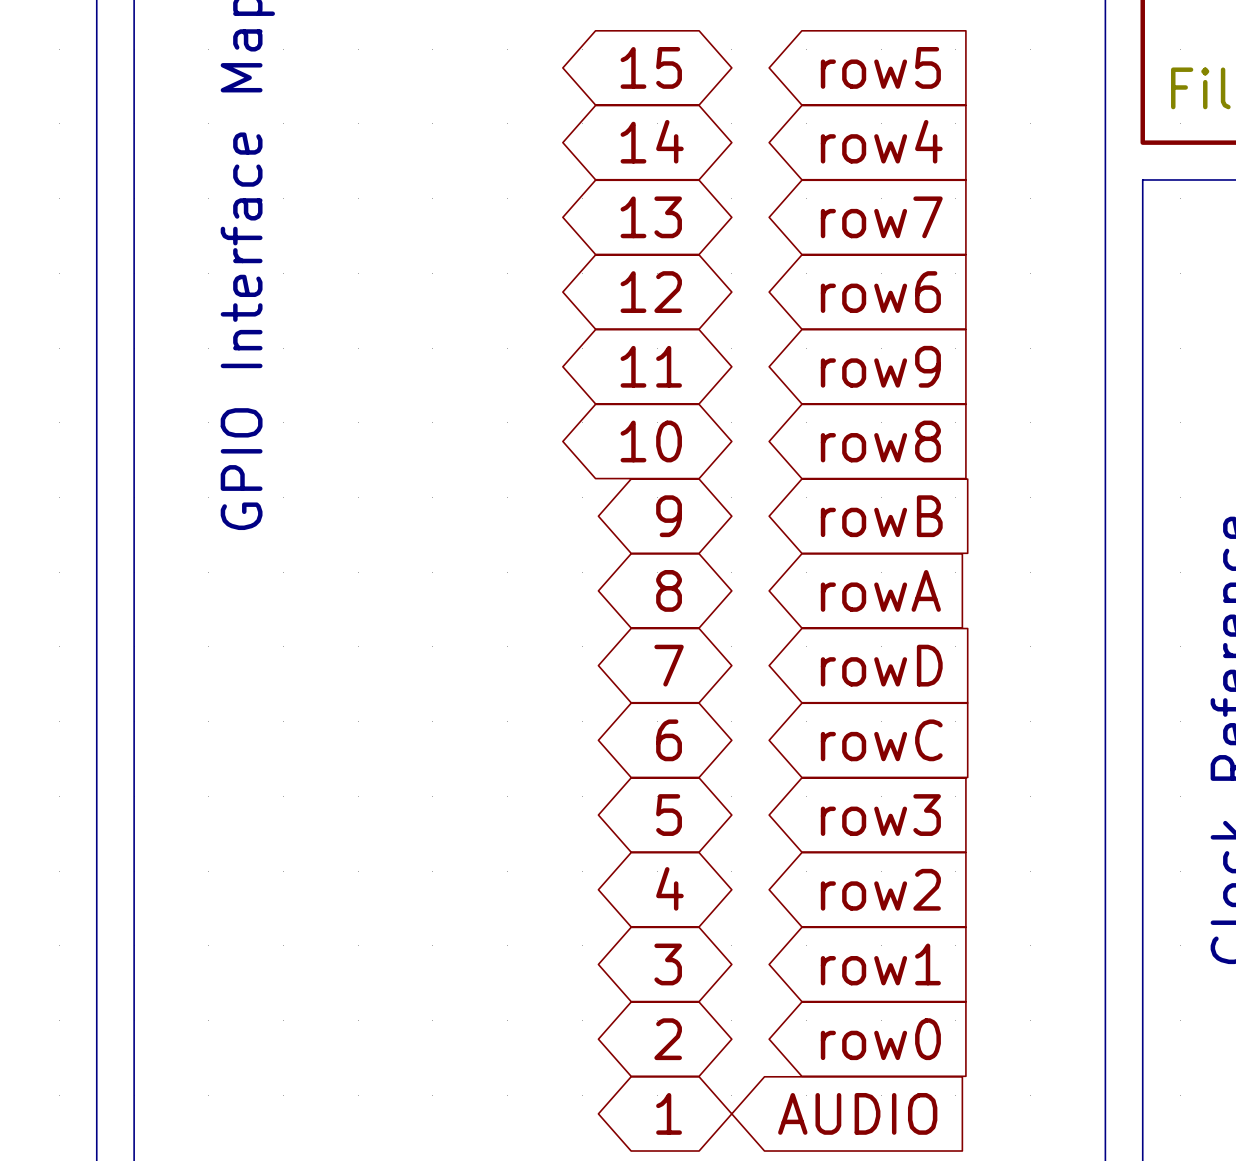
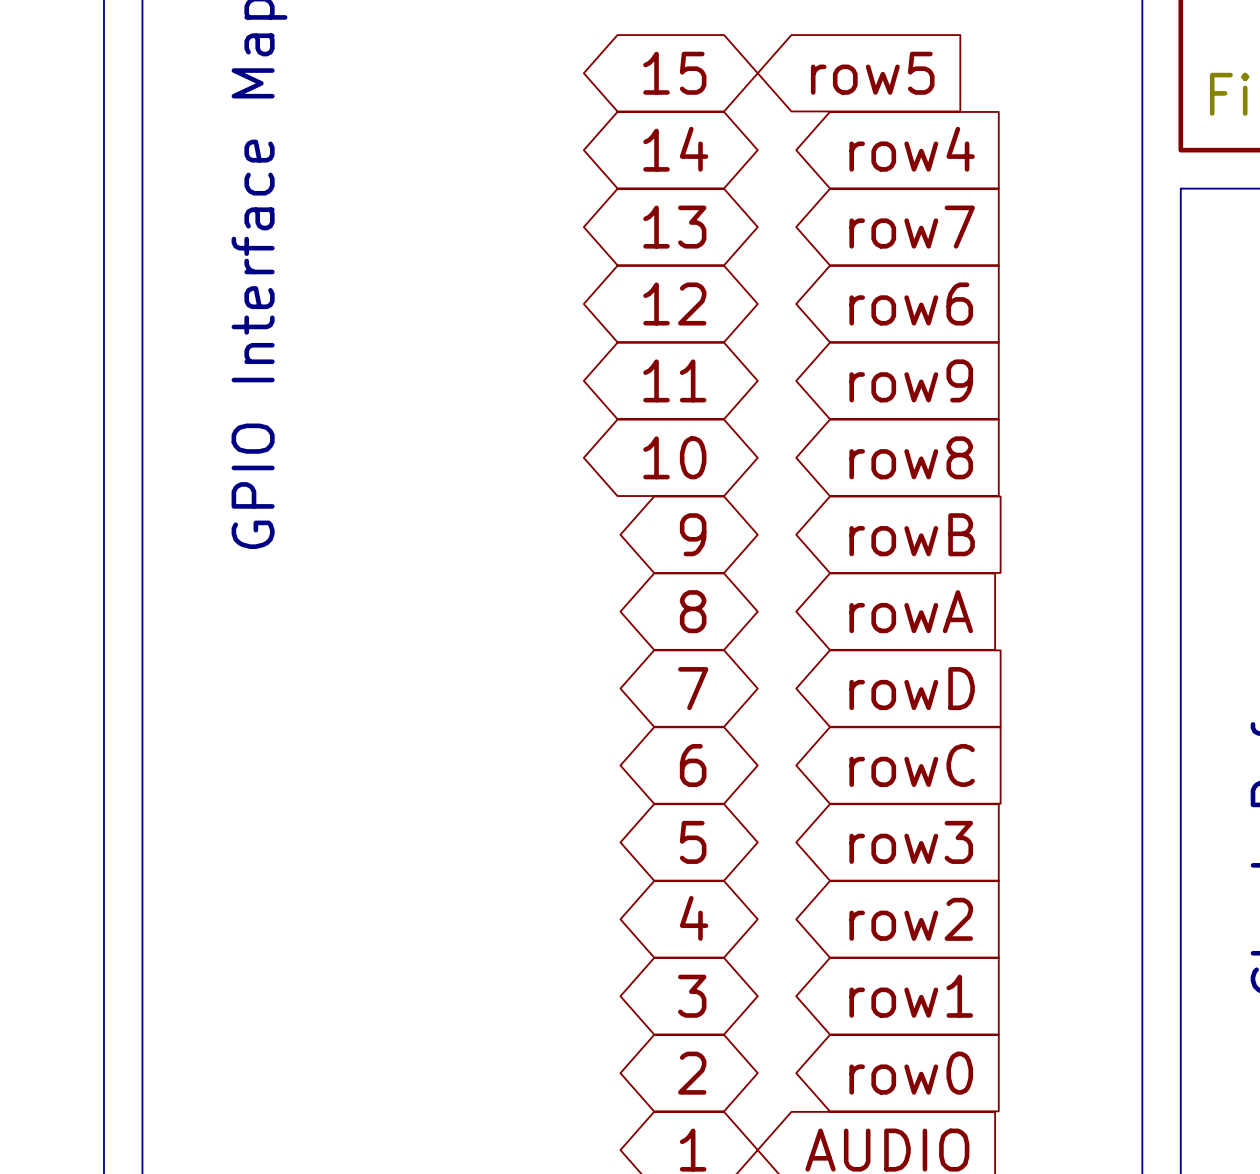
global label position: row5 (880, 67) -> row5 (872, 73)

